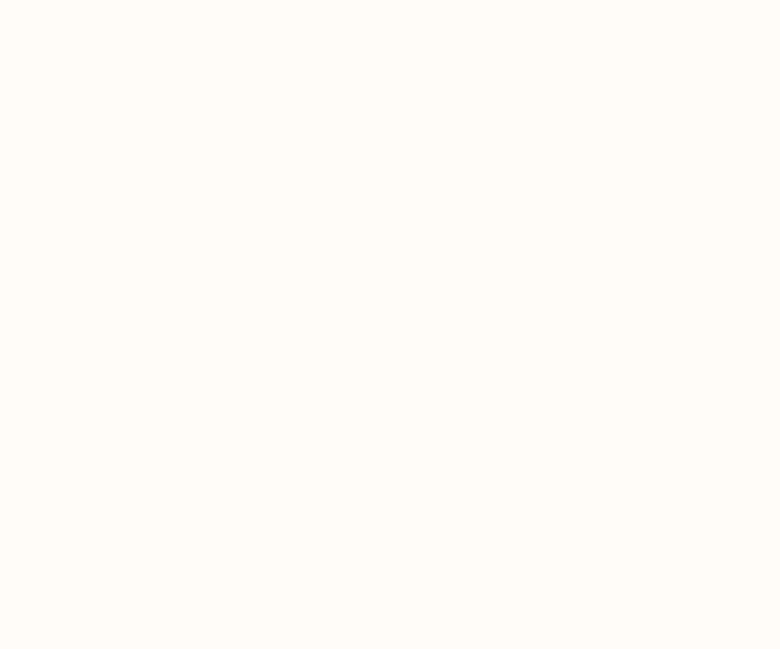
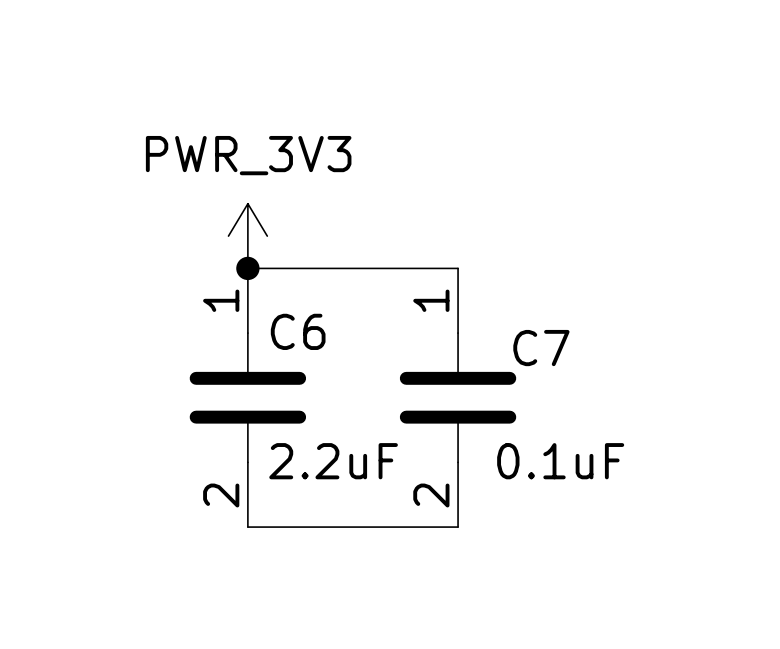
power symbol: none -> PWR_3V3 (247, 236)
wire: none -> (247, 268) (458, 268)
junction: none -> (247, 268)
C6: none -> 2.2uF (247, 397)
C7: none -> 0.1uF (458, 397)
wire: none -> (247, 527) (458, 527)

